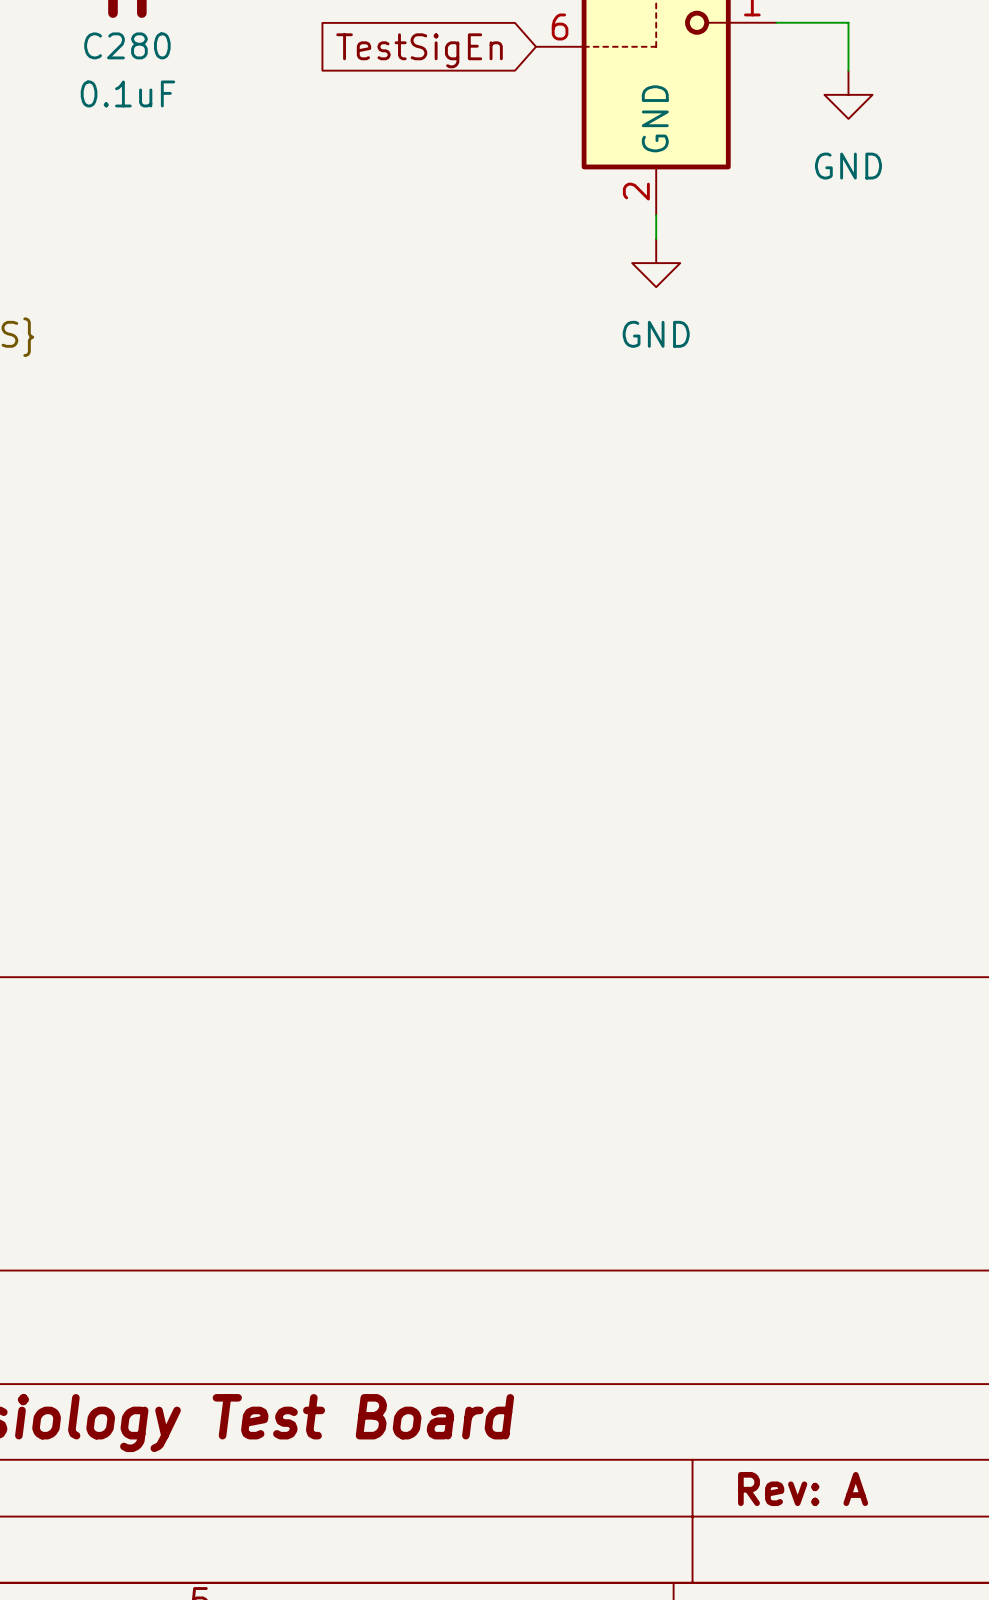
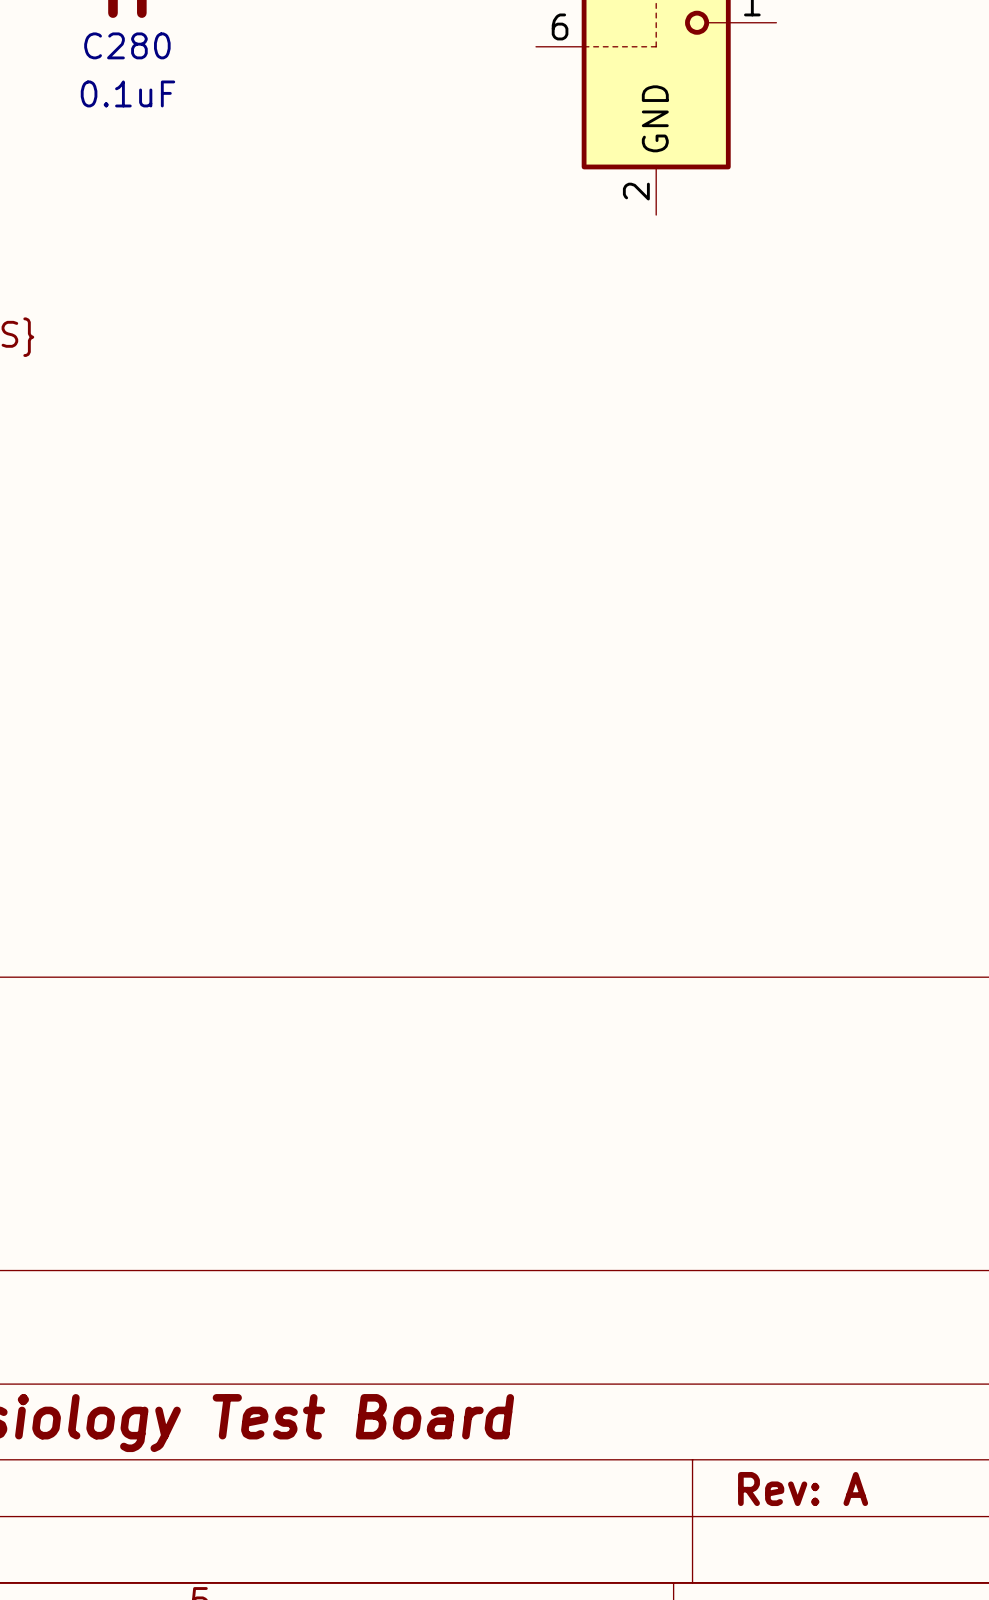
wire: (776, 22) (848, 22) (848, 70) -> none
global label: TestSigEn (419, 50) -> none
power symbol: GND (848, 94) -> none
wire: (656, 215) (656, 239) -> none
power symbol: GND (656, 263) -> none

